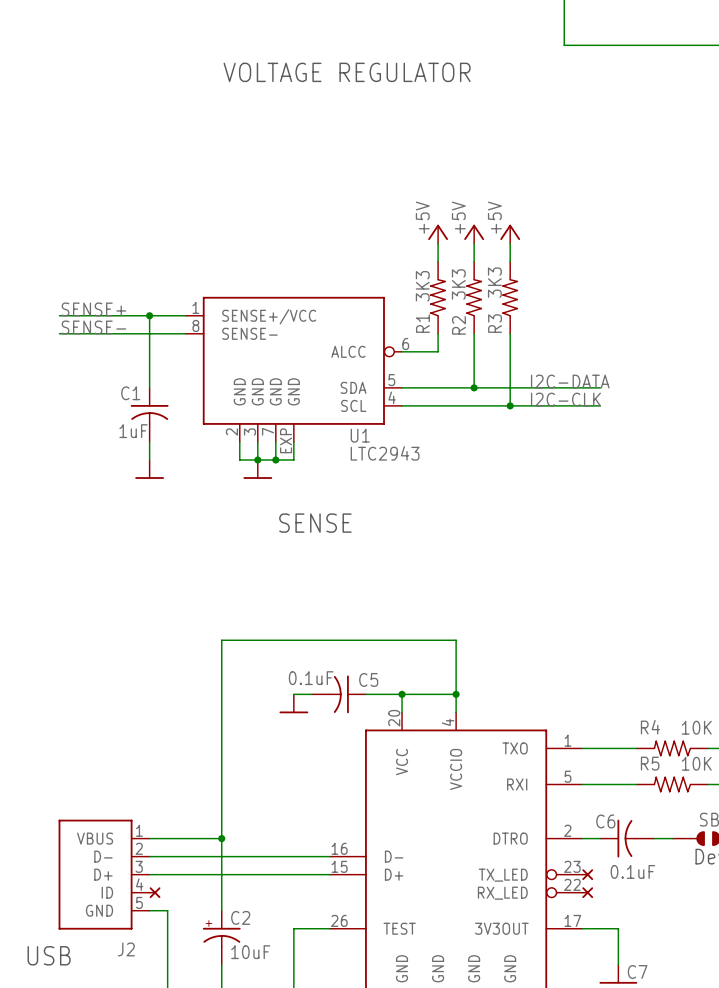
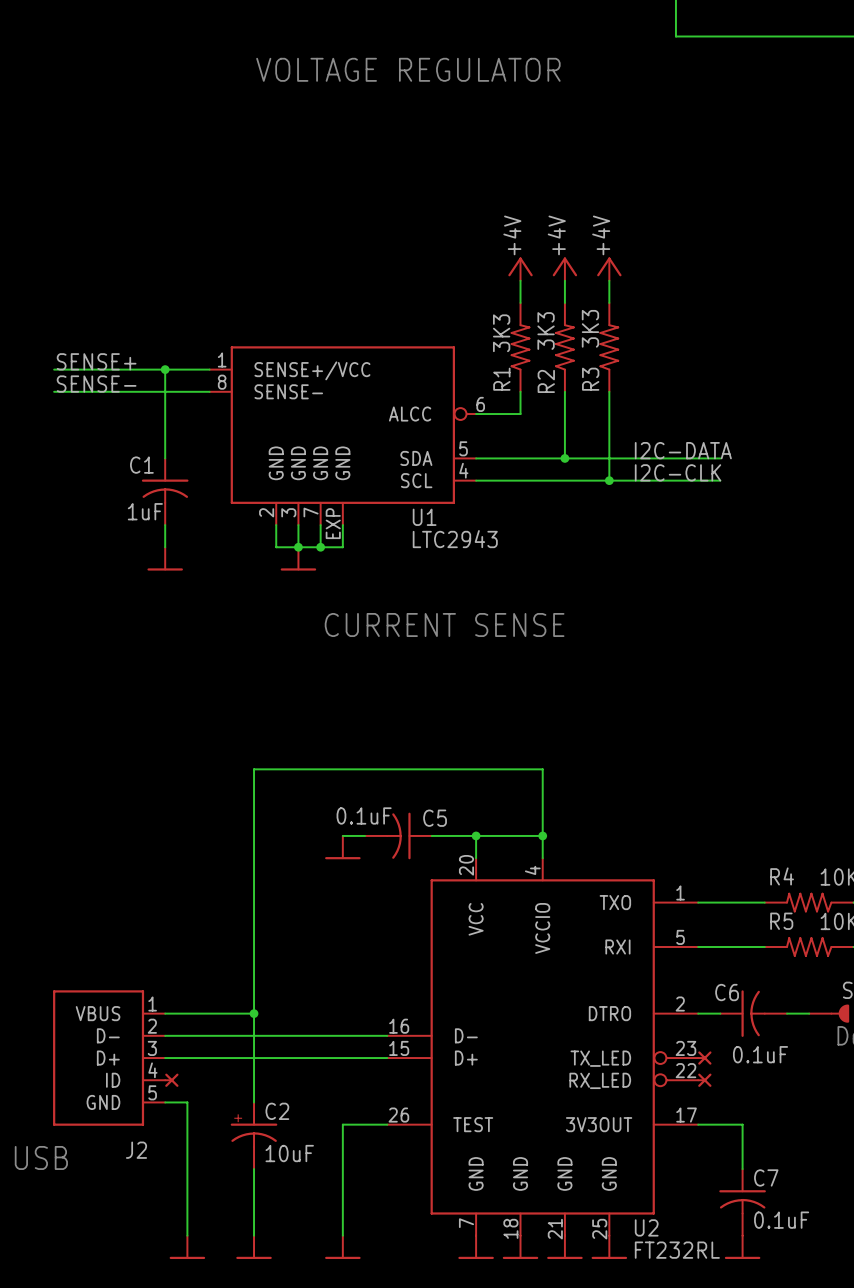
power symbol: +5V (438, 234) -> +4V (520, 269)
power symbol: +5V (474, 234) -> +4V (564, 269)
power symbol: +5V (510, 234) -> +4V (609, 269)
text: SENSE (315, 523) -> CURRENT SENSE (444, 624)

